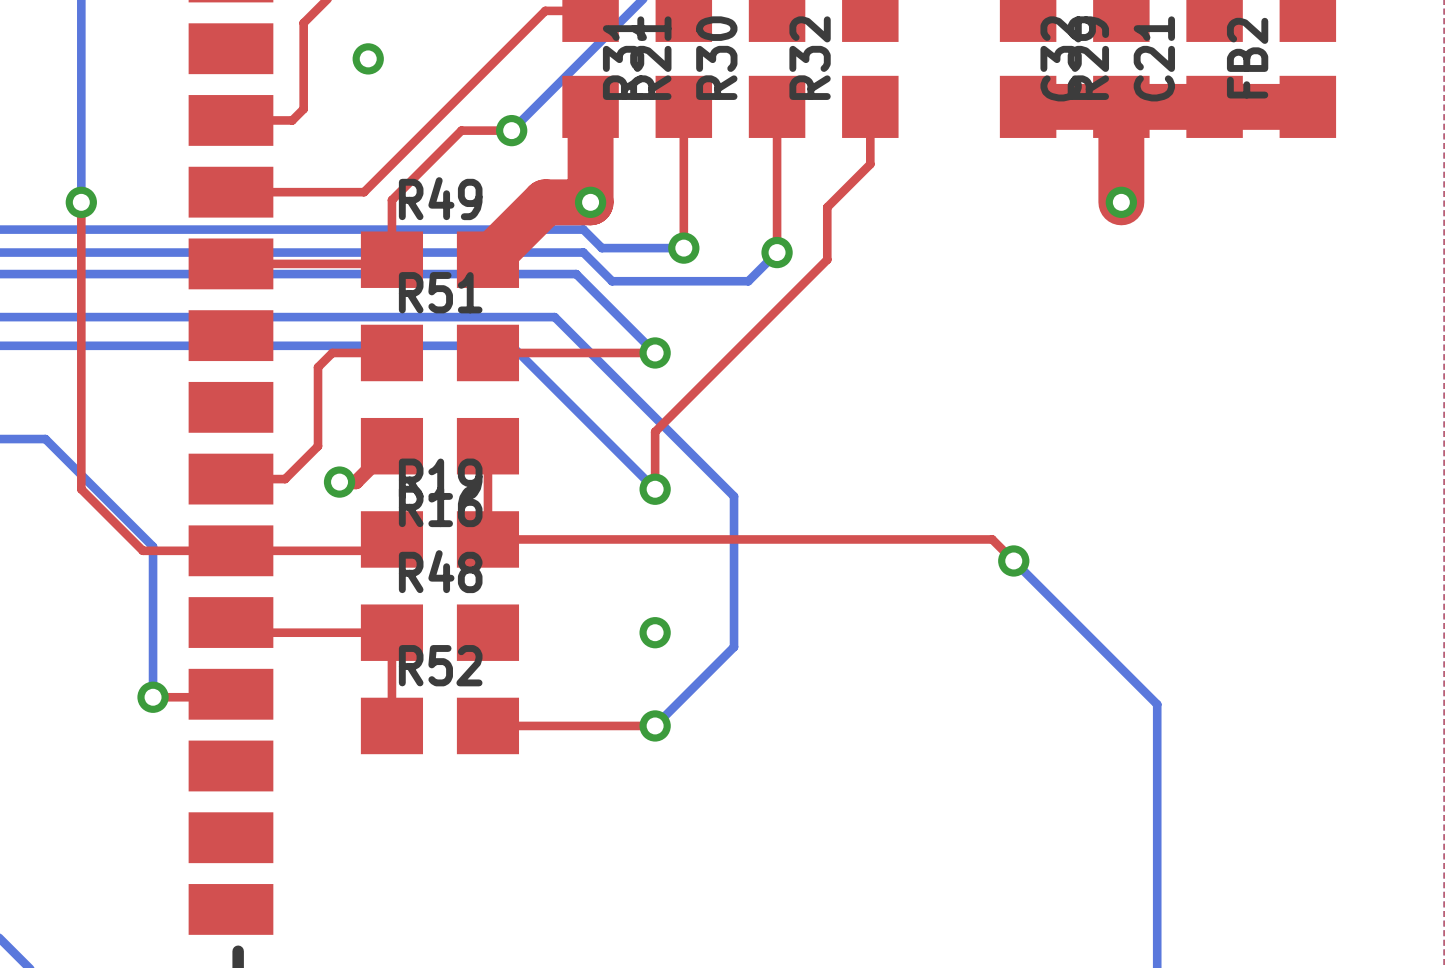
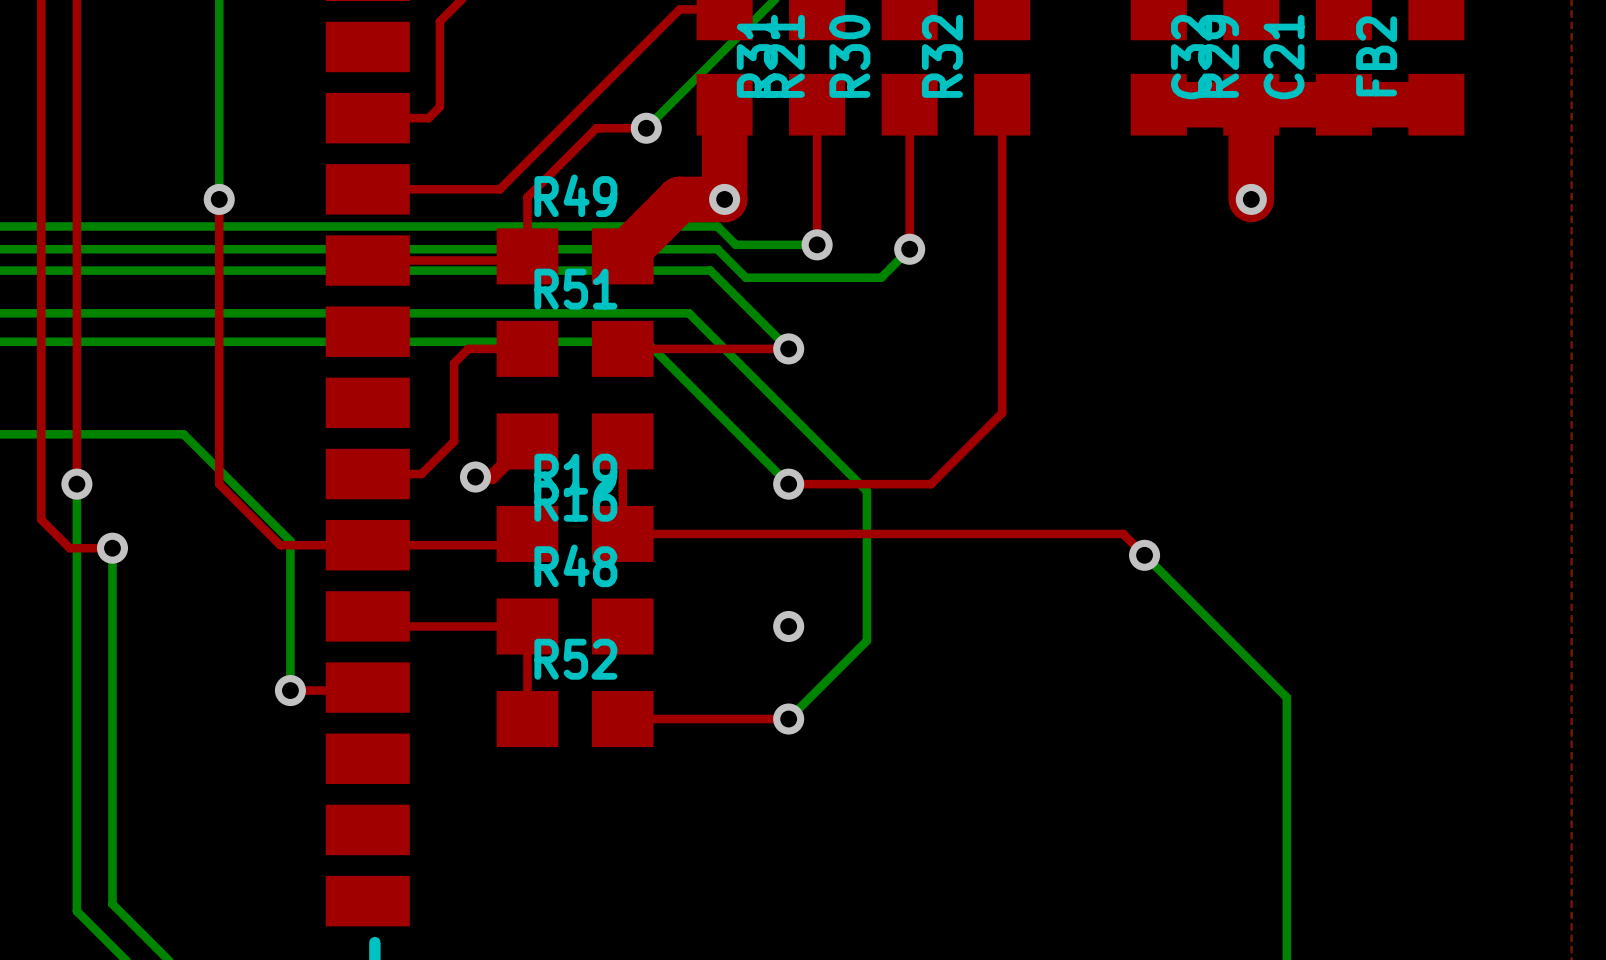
via: (368, 58) -> none
top track: (870, 164) (827, 207) (827, 259) (655, 431) (655, 489) -> (1002, 161) (1002, 412) (931, 484) (788, 484)

